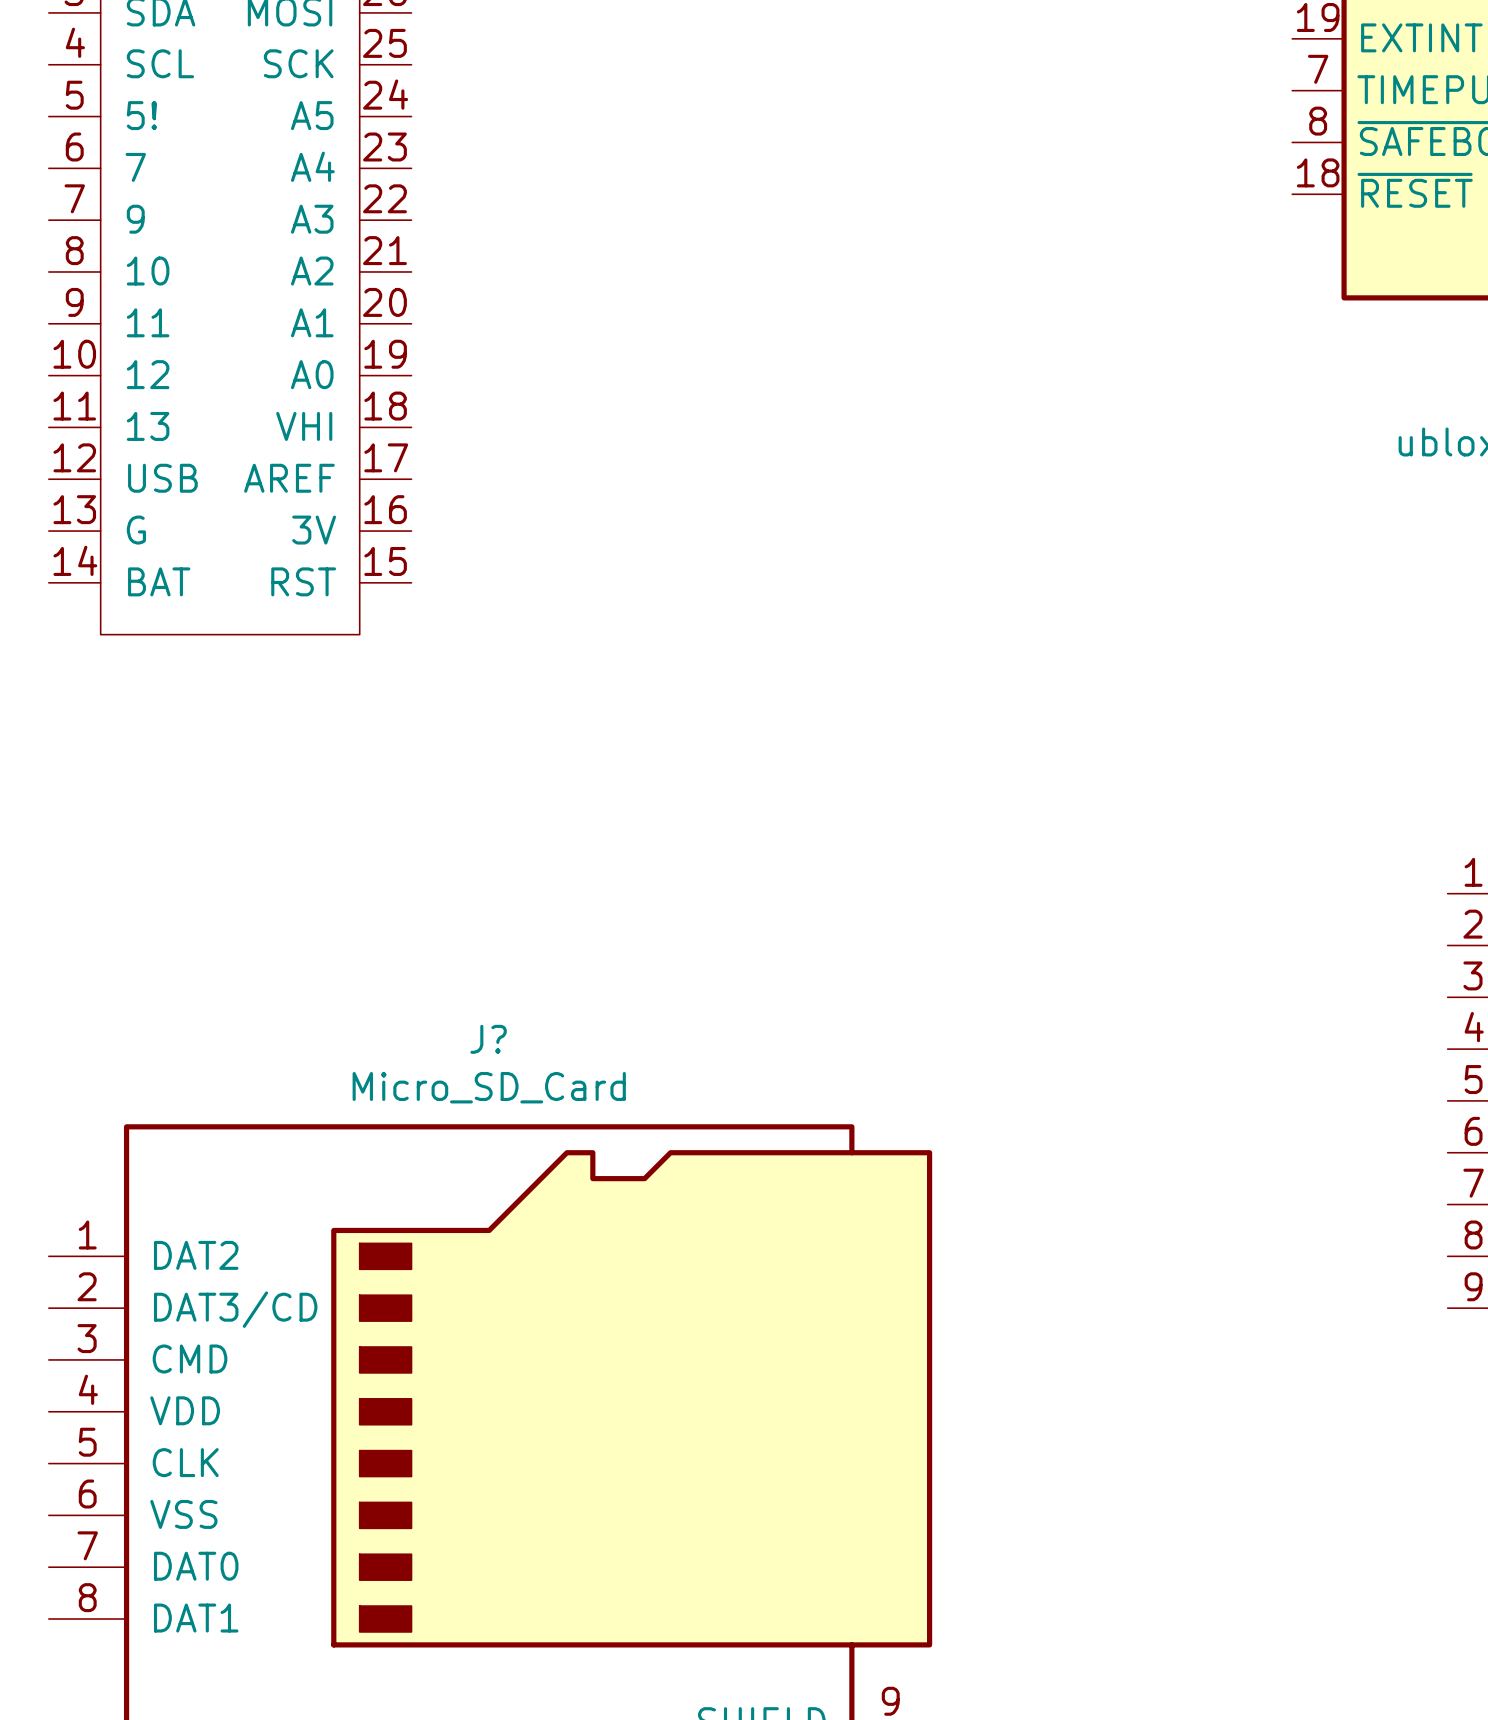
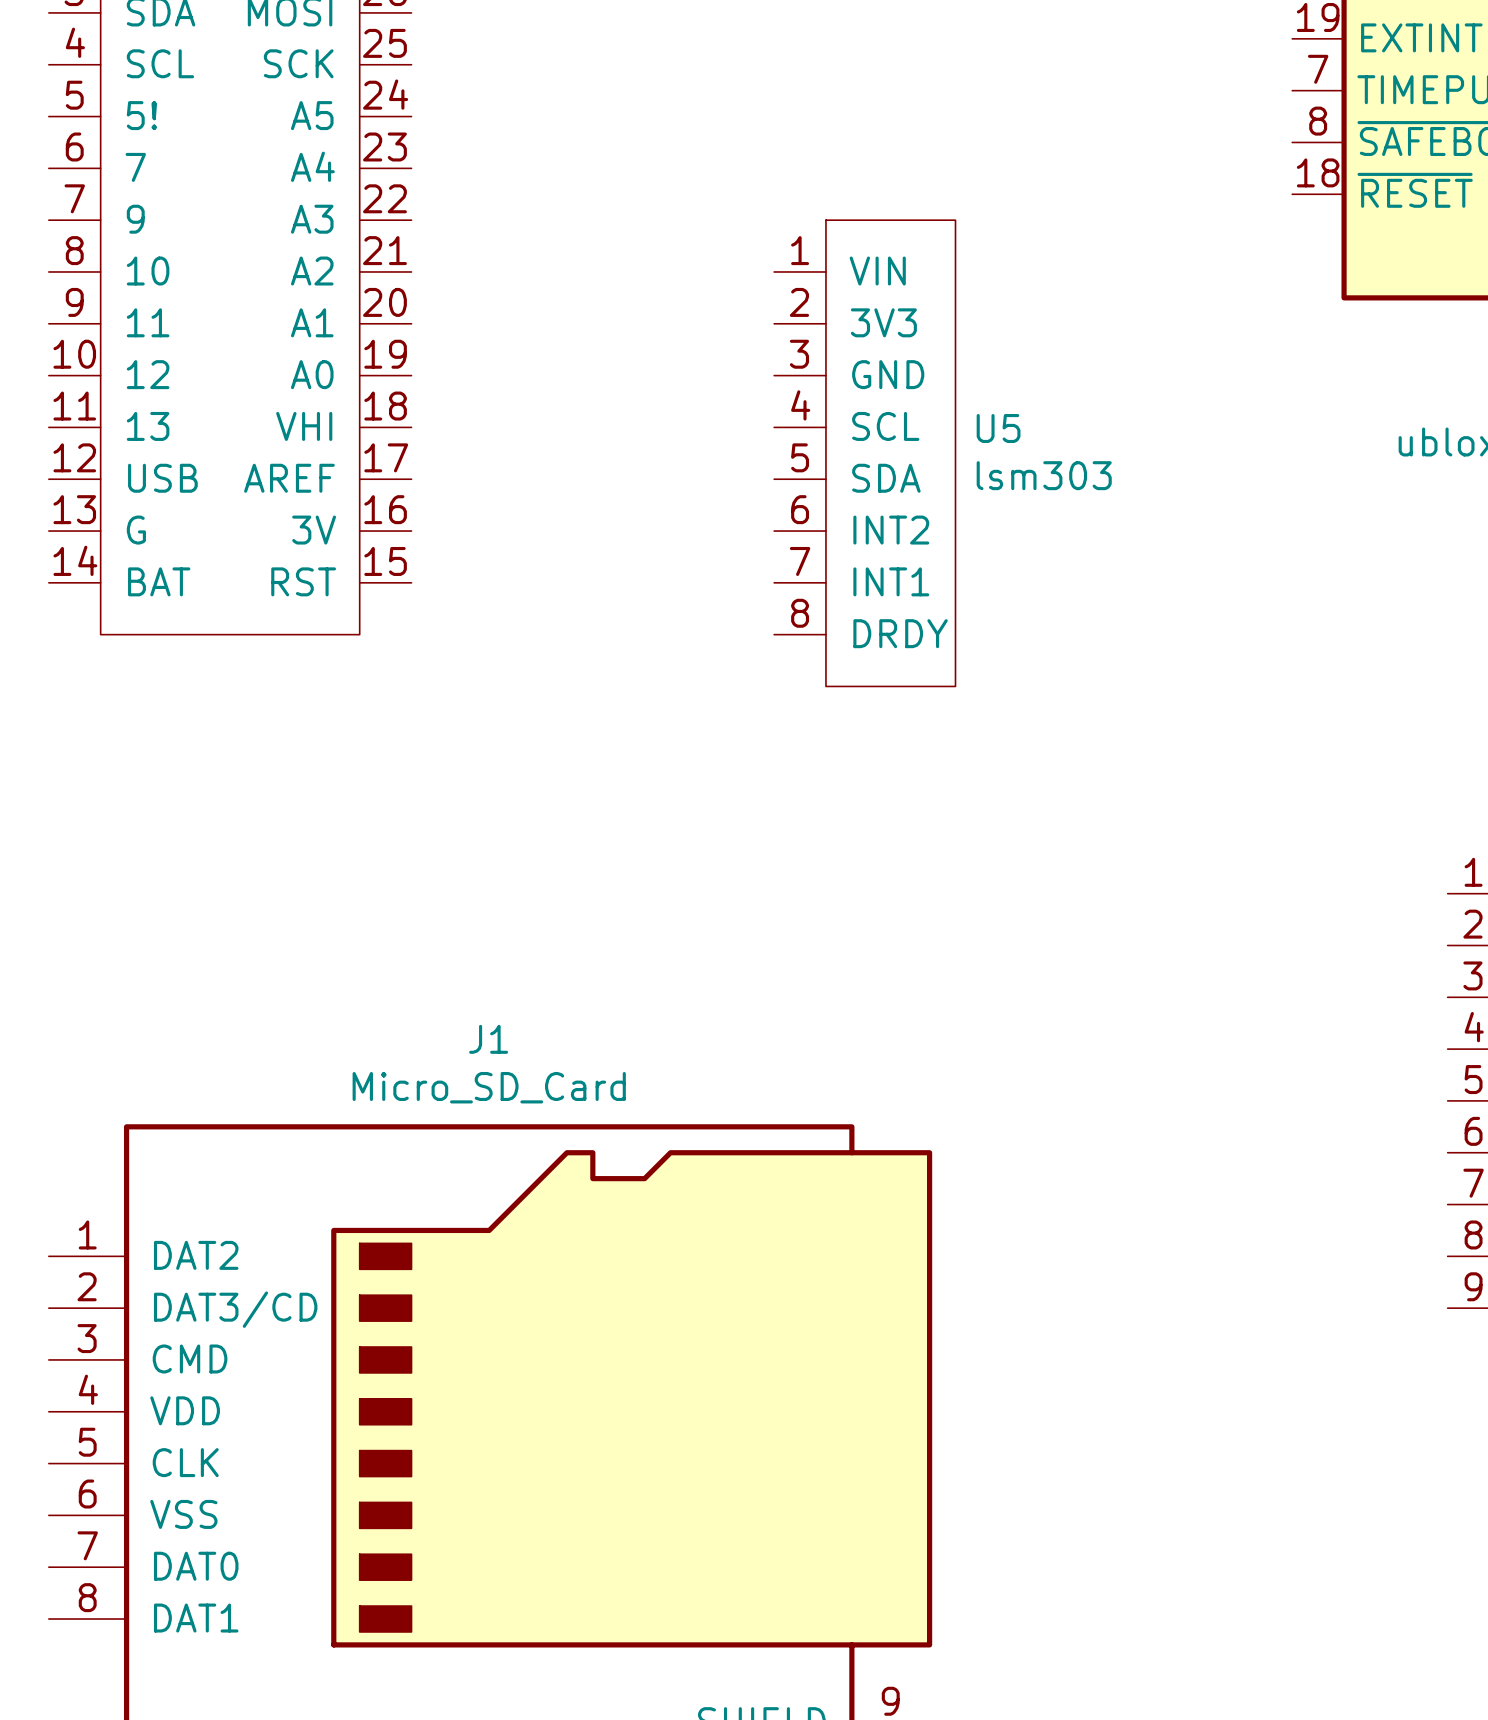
U5: none -> lsm303 (864, 453)
J? name: J? (488, 1039) -> J1 (488, 1039)

